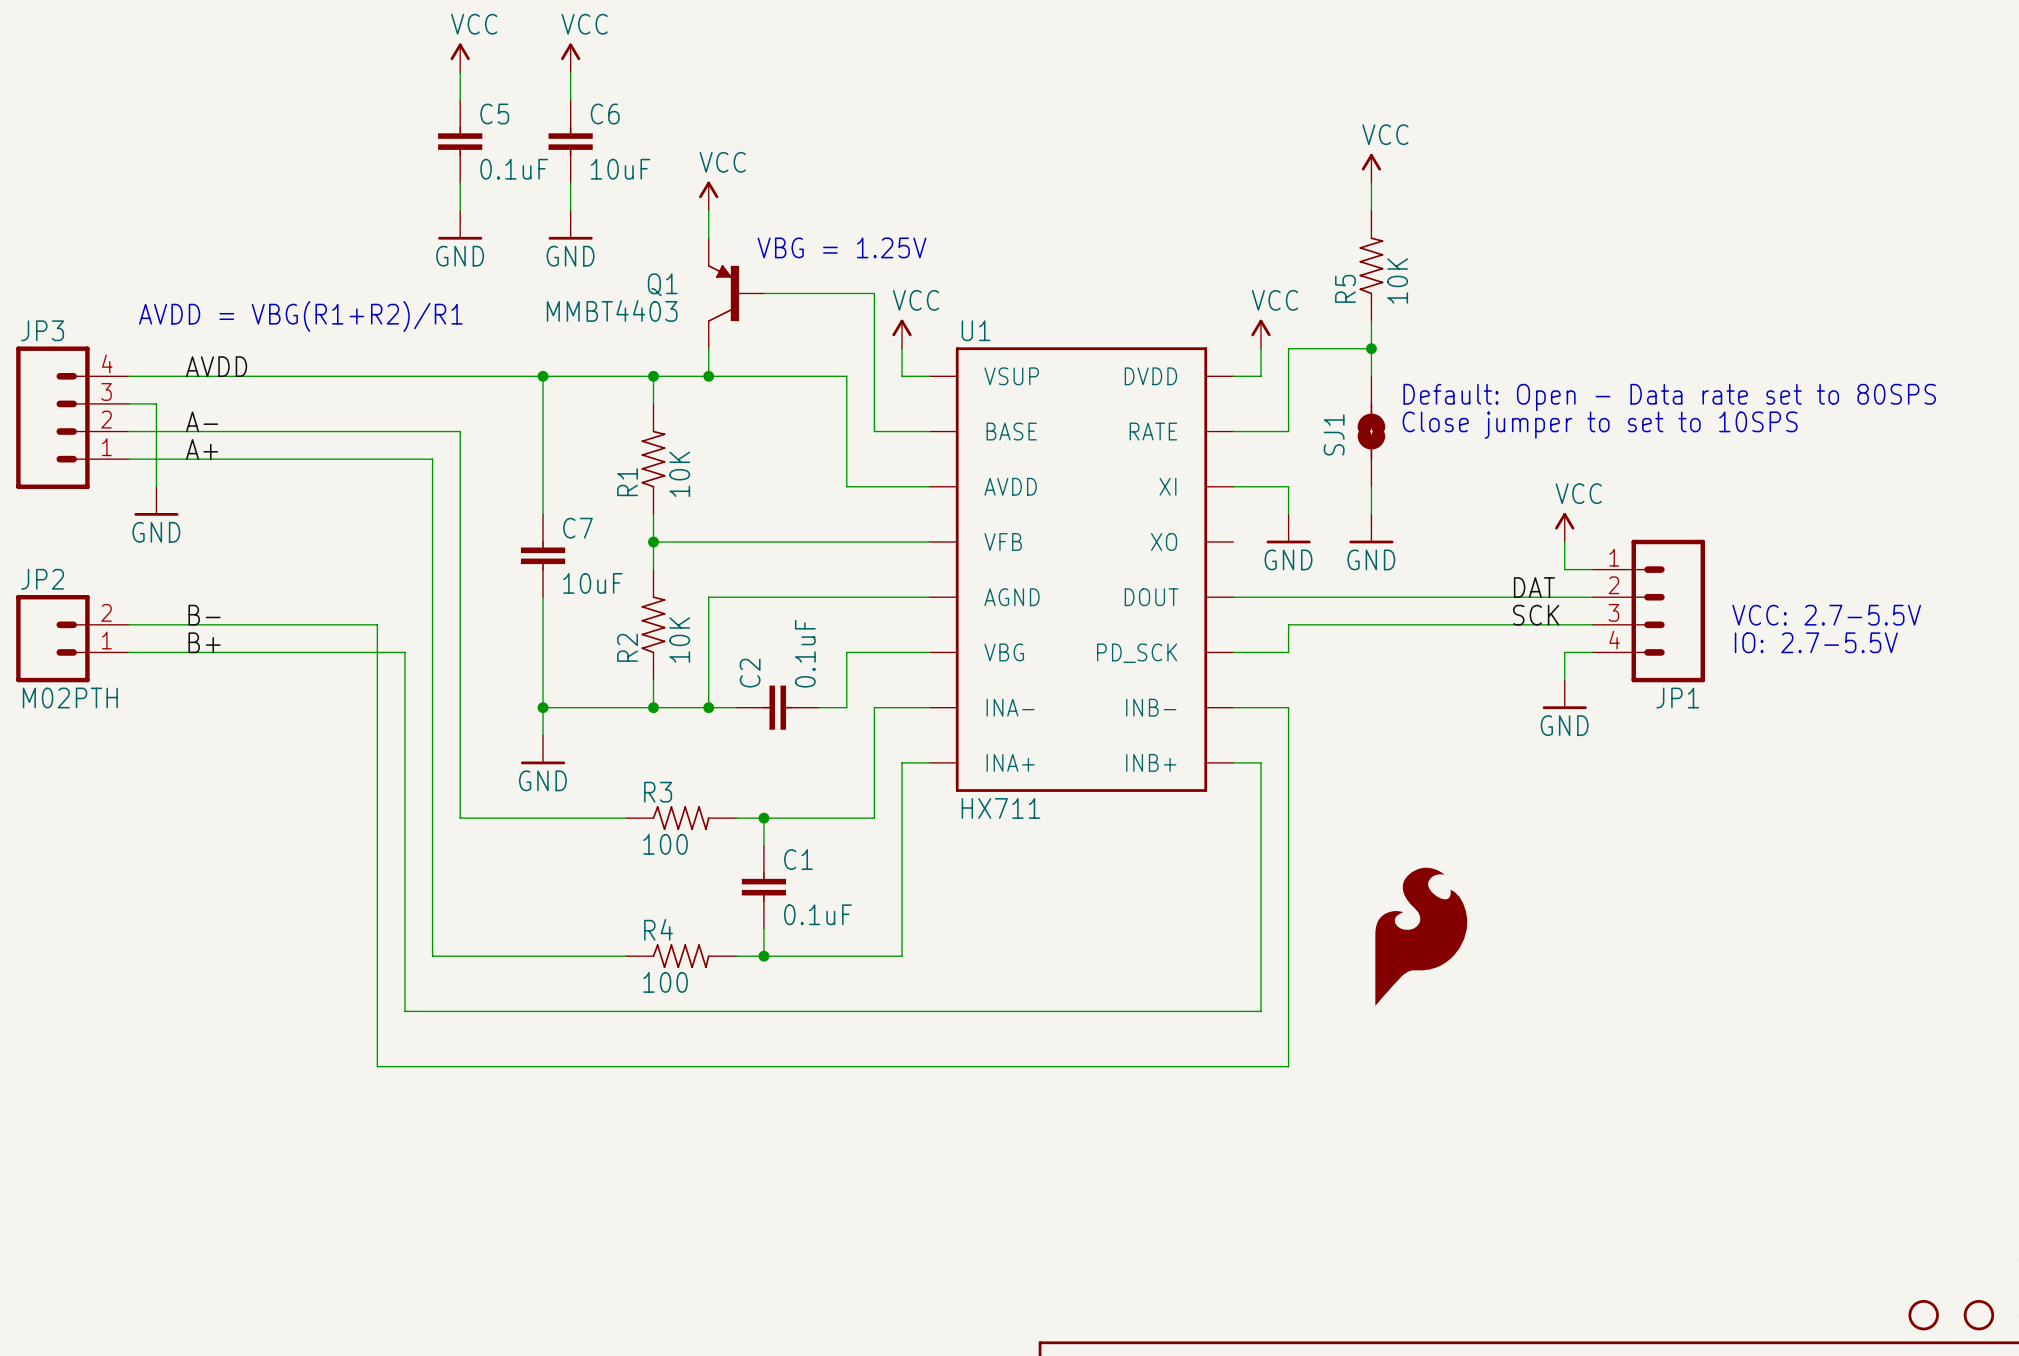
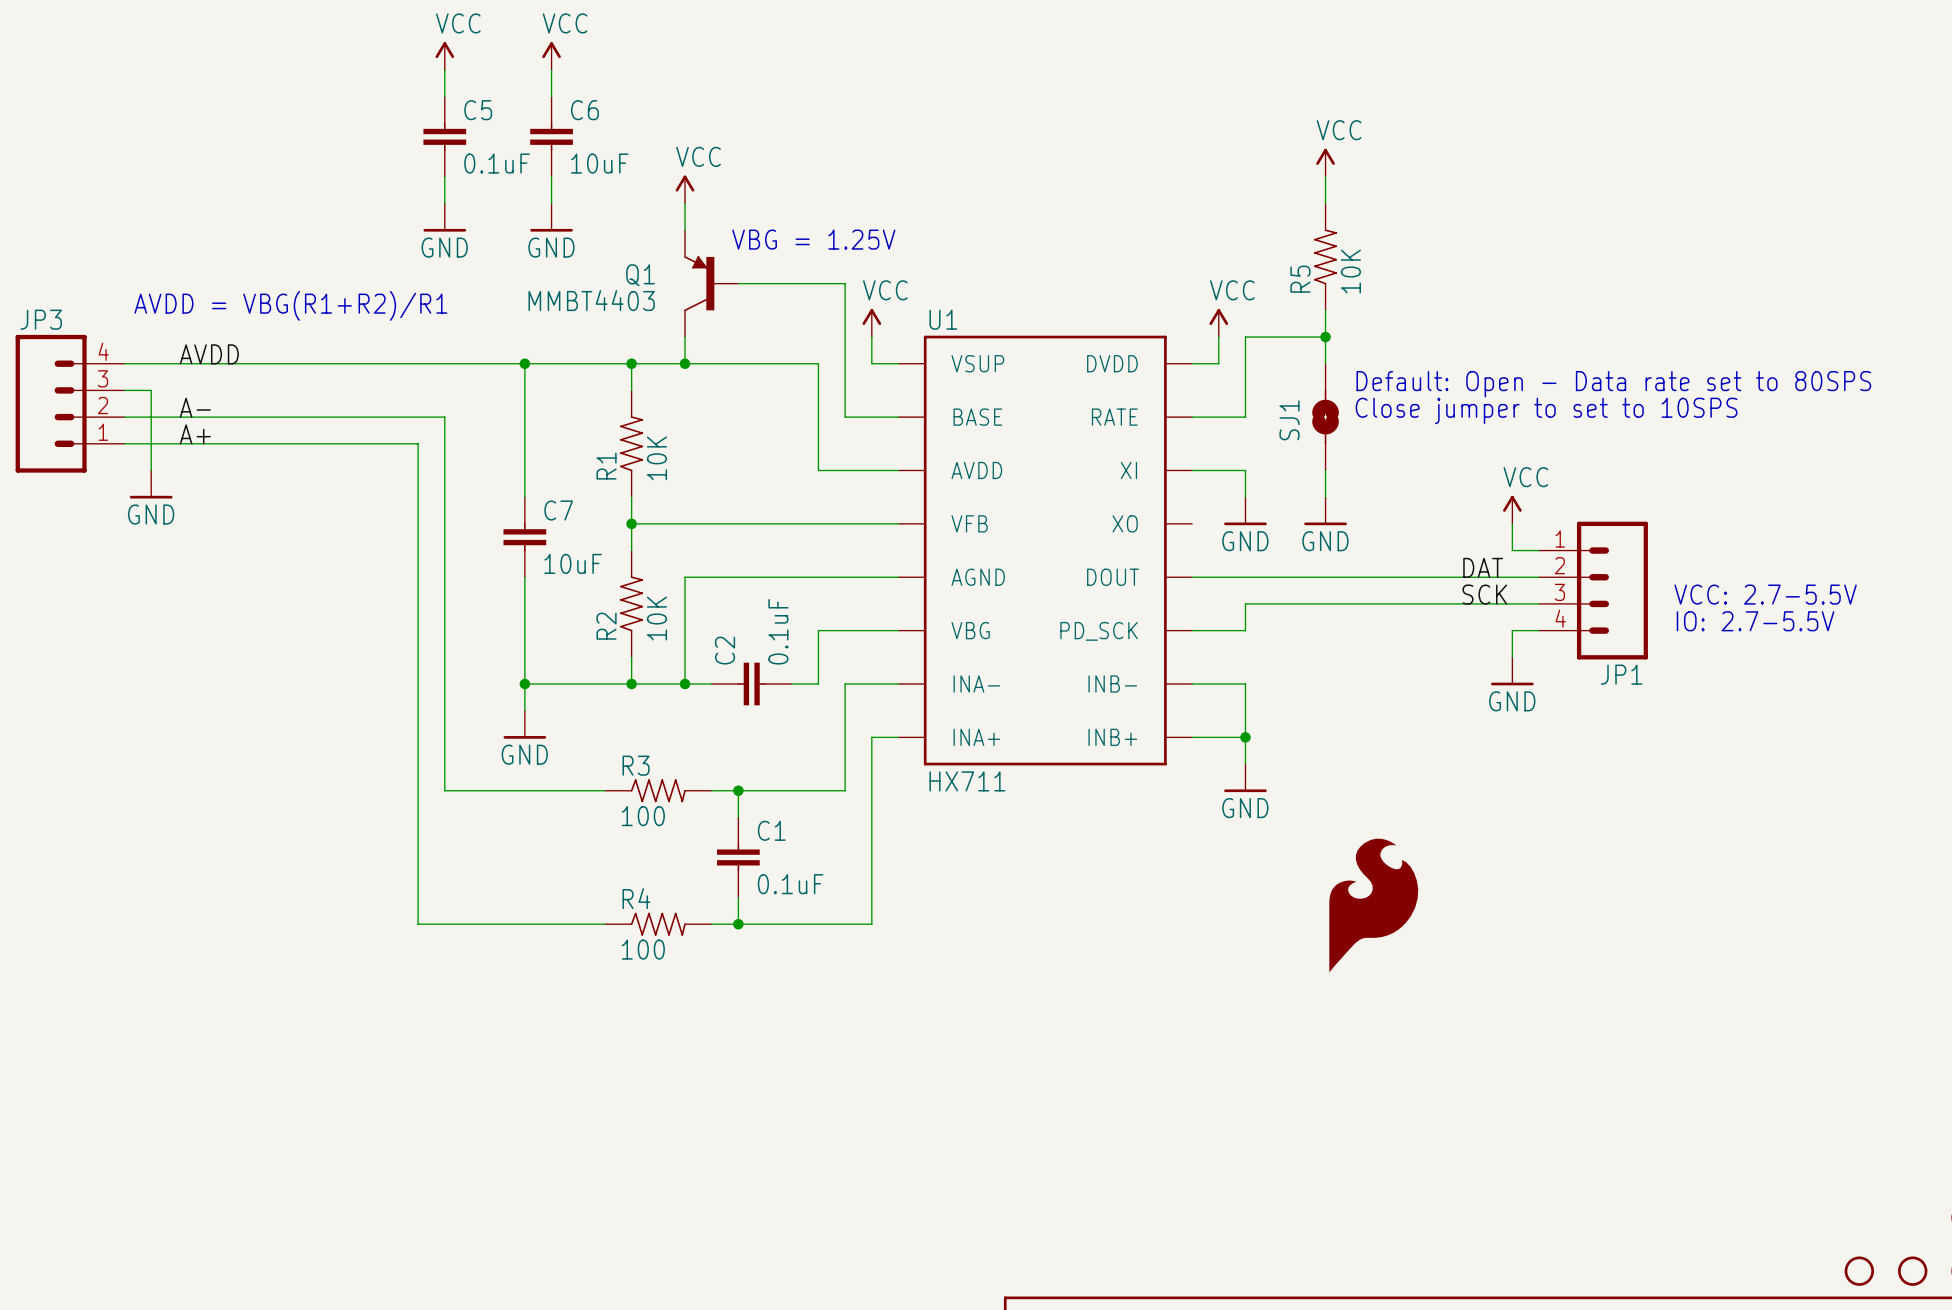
label: B- (204, 615) -> none
wire: (128, 624) (377, 624) (377, 1066) (1288, 1066) (1288, 790) -> none
JP2: M02PTH (72, 638) -> none
label: B+ (204, 642) -> none
wire: (128, 652) (404, 652) (404, 1011) (1260, 1011) (1260, 762) -> (1245, 737) (1218, 737)
junction: none -> (1245, 737)
power symbol: none -> GND (1245, 778)

